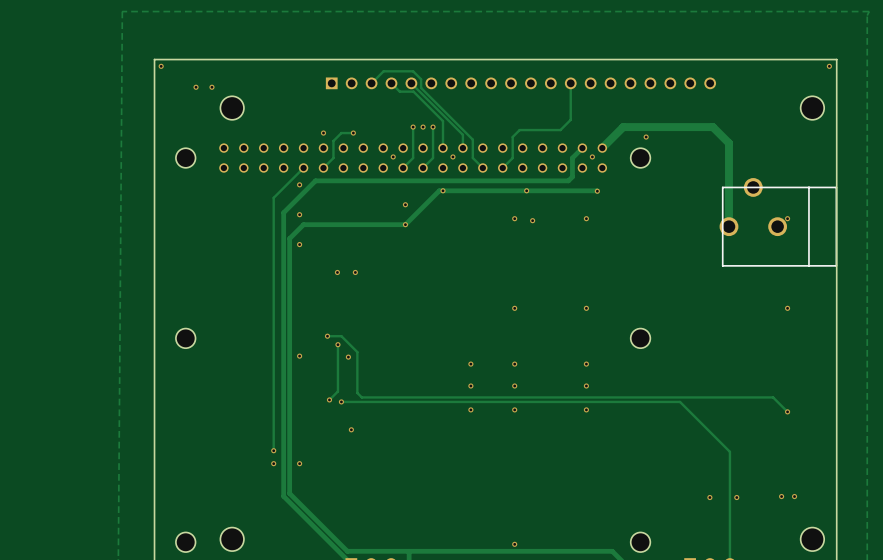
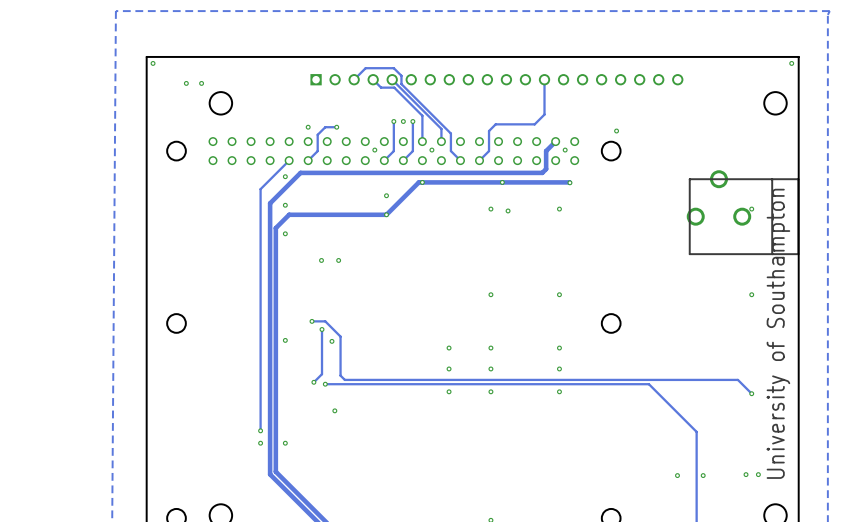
track: (602, 147) (623, 127) (712, 127) (728, 143) (728, 226) -> none
text: none -> University of Southampton (778, 333)

